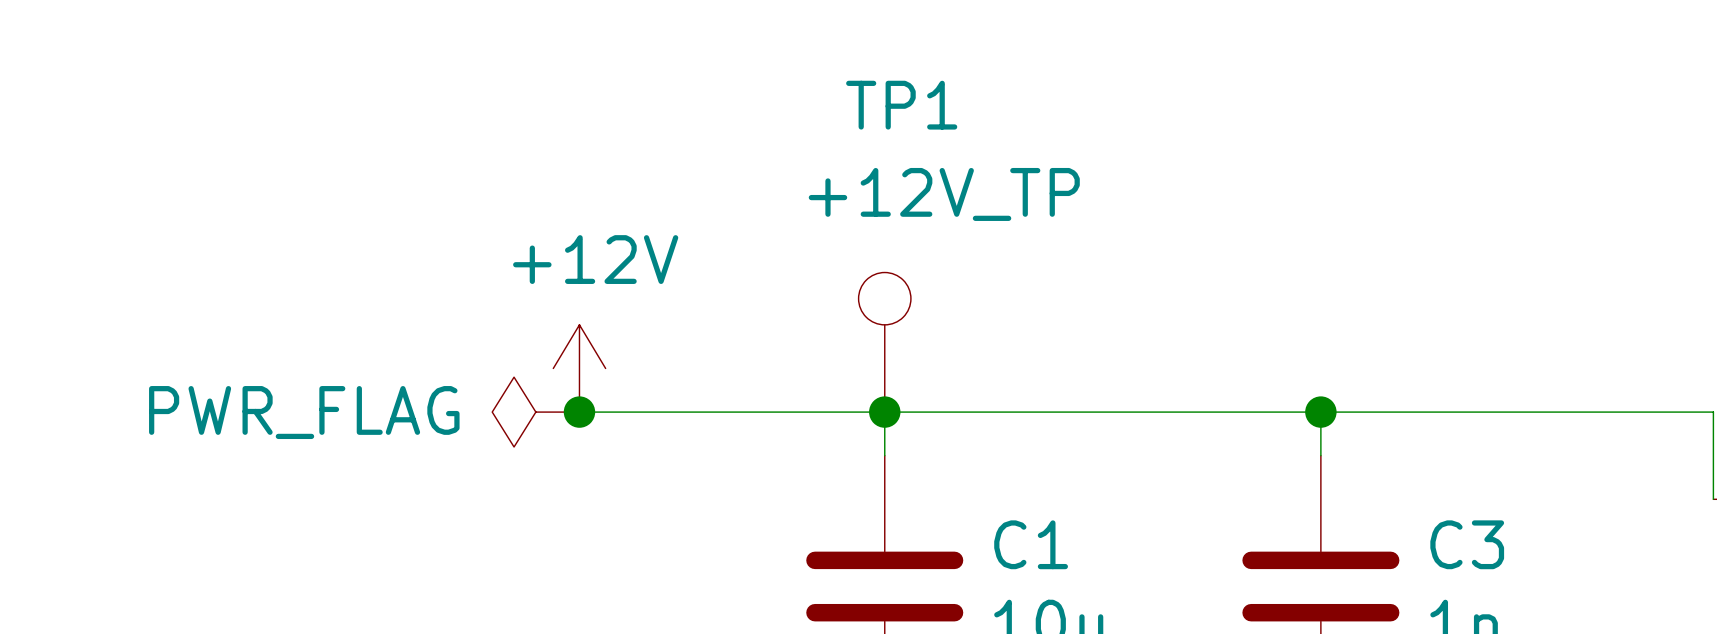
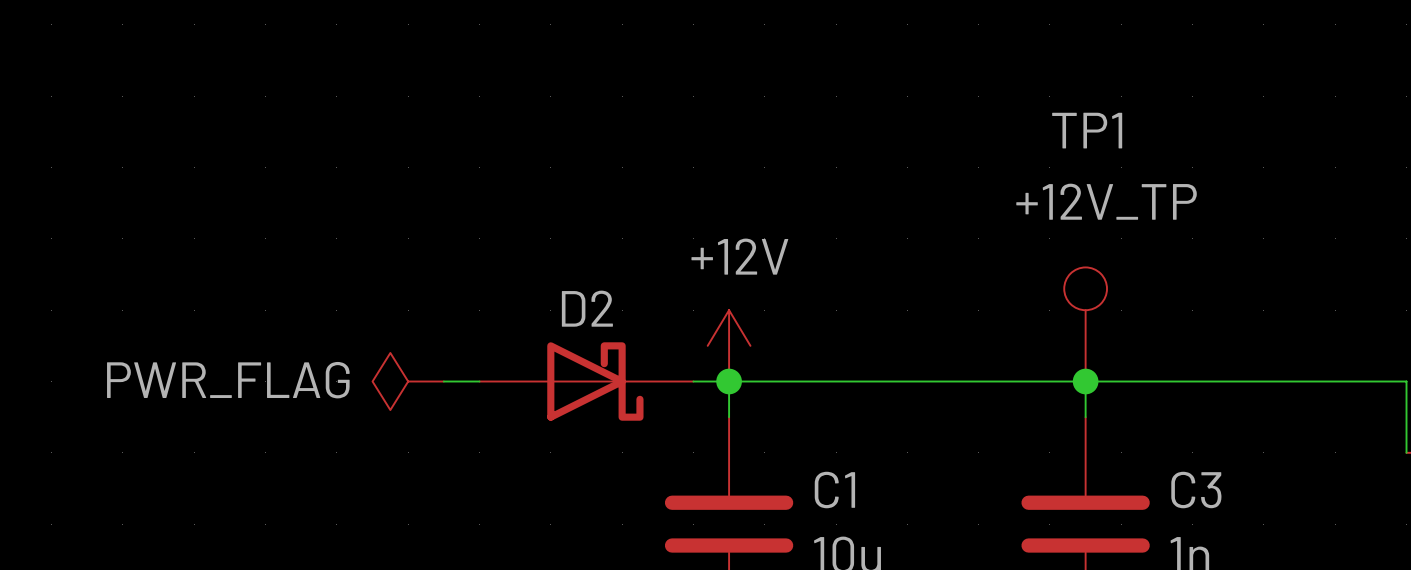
TP1 position: (884, 342) -> (1085, 324)
power symbol position: +12V (579, 368) -> +12V (729, 345)
power symbol position: PWR_FLAG (535, 412) -> PWR_FLAG (408, 381)
junction: (579, 412) -> none
D2: none -> (586, 381)

